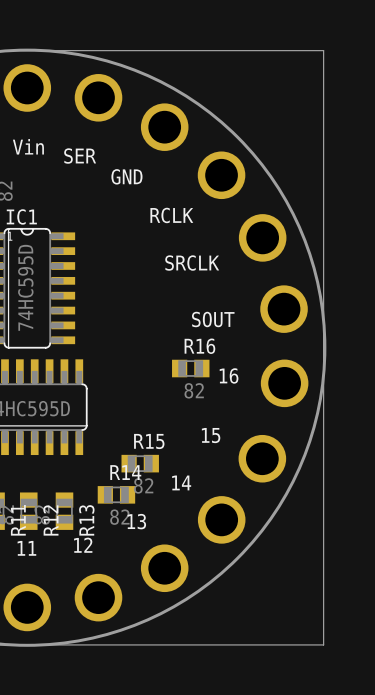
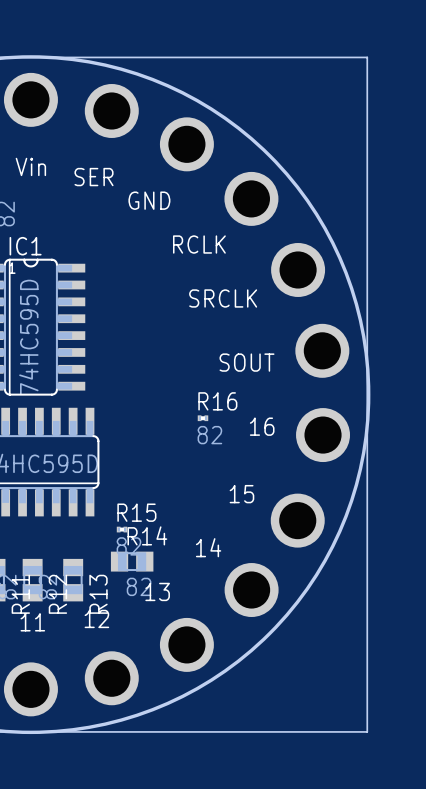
R16 footprint: [172, 359, 210, 378] -> [197, 415, 209, 422]
R15 footprint: [121, 454, 159, 473] -> [116, 526, 128, 533]

